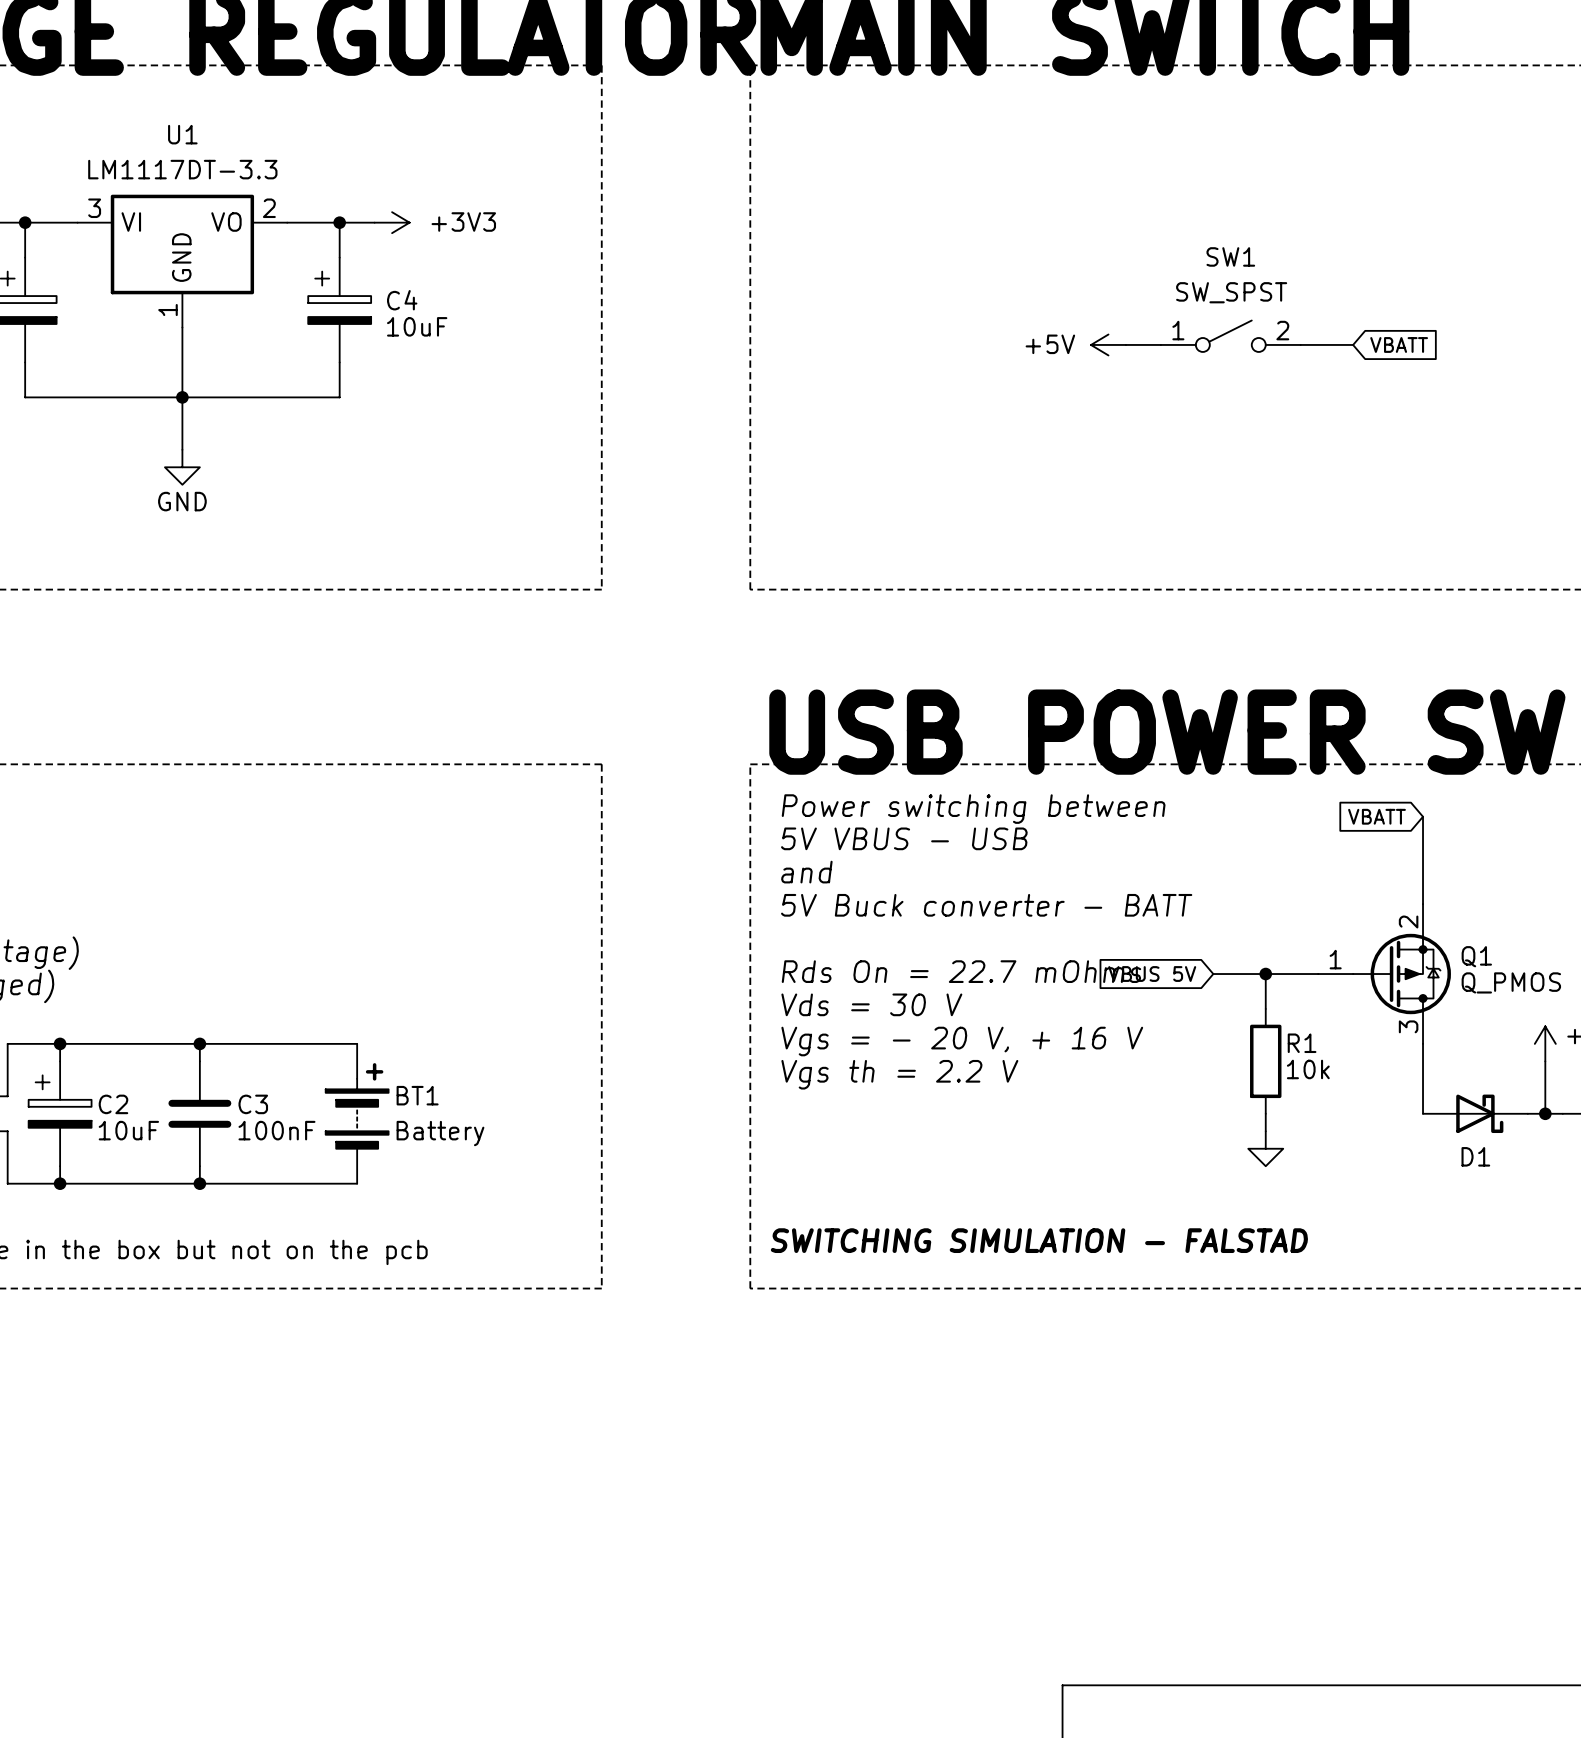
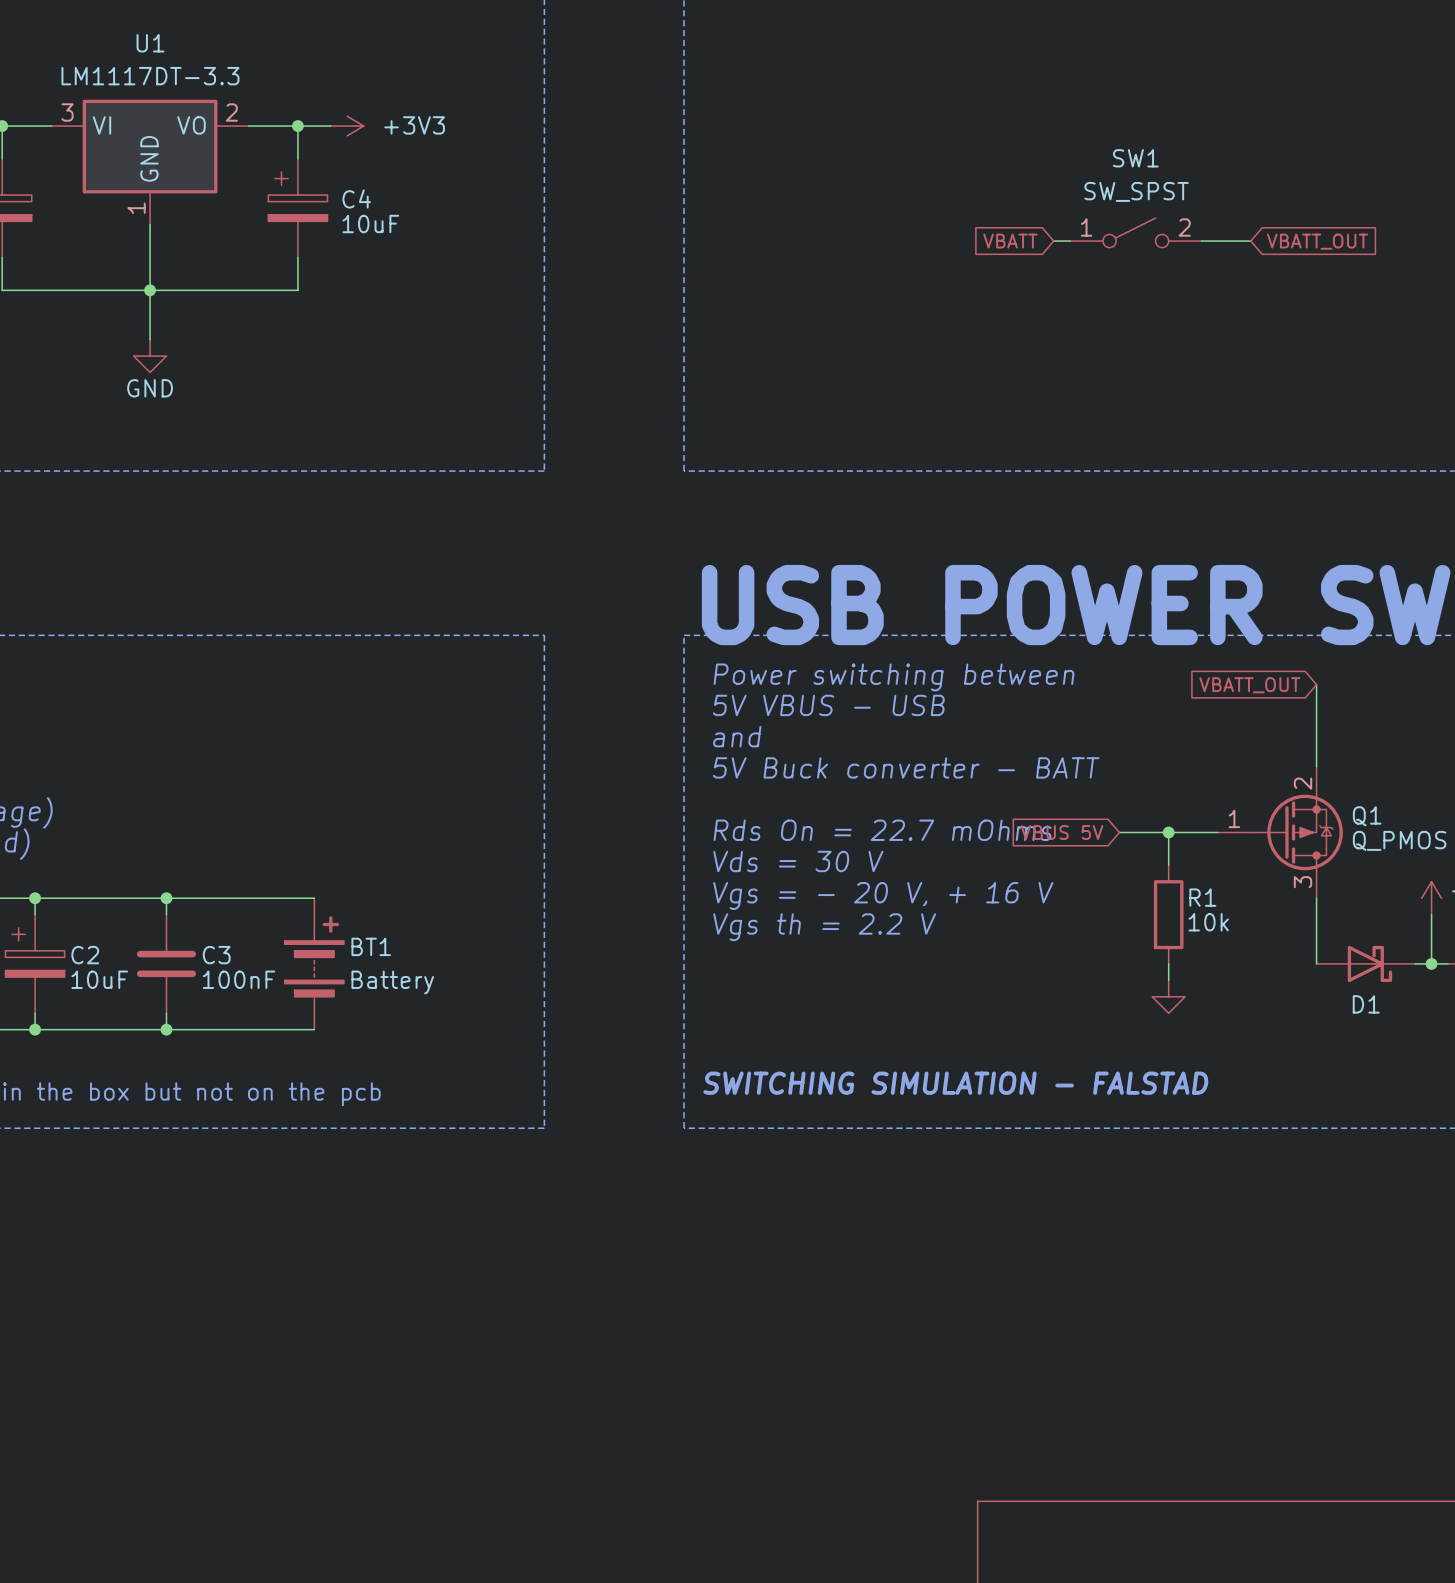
global label: none -> VBATT (1010, 241)
power symbol: +5V (1108, 344) -> none
wire: (1125, 344) (1143, 344) -> none
global label: VBATT (1399, 344) -> VBATT_OUT (1317, 241)
global label: VBATT (1377, 816) -> VBATT_OUT (1249, 685)

